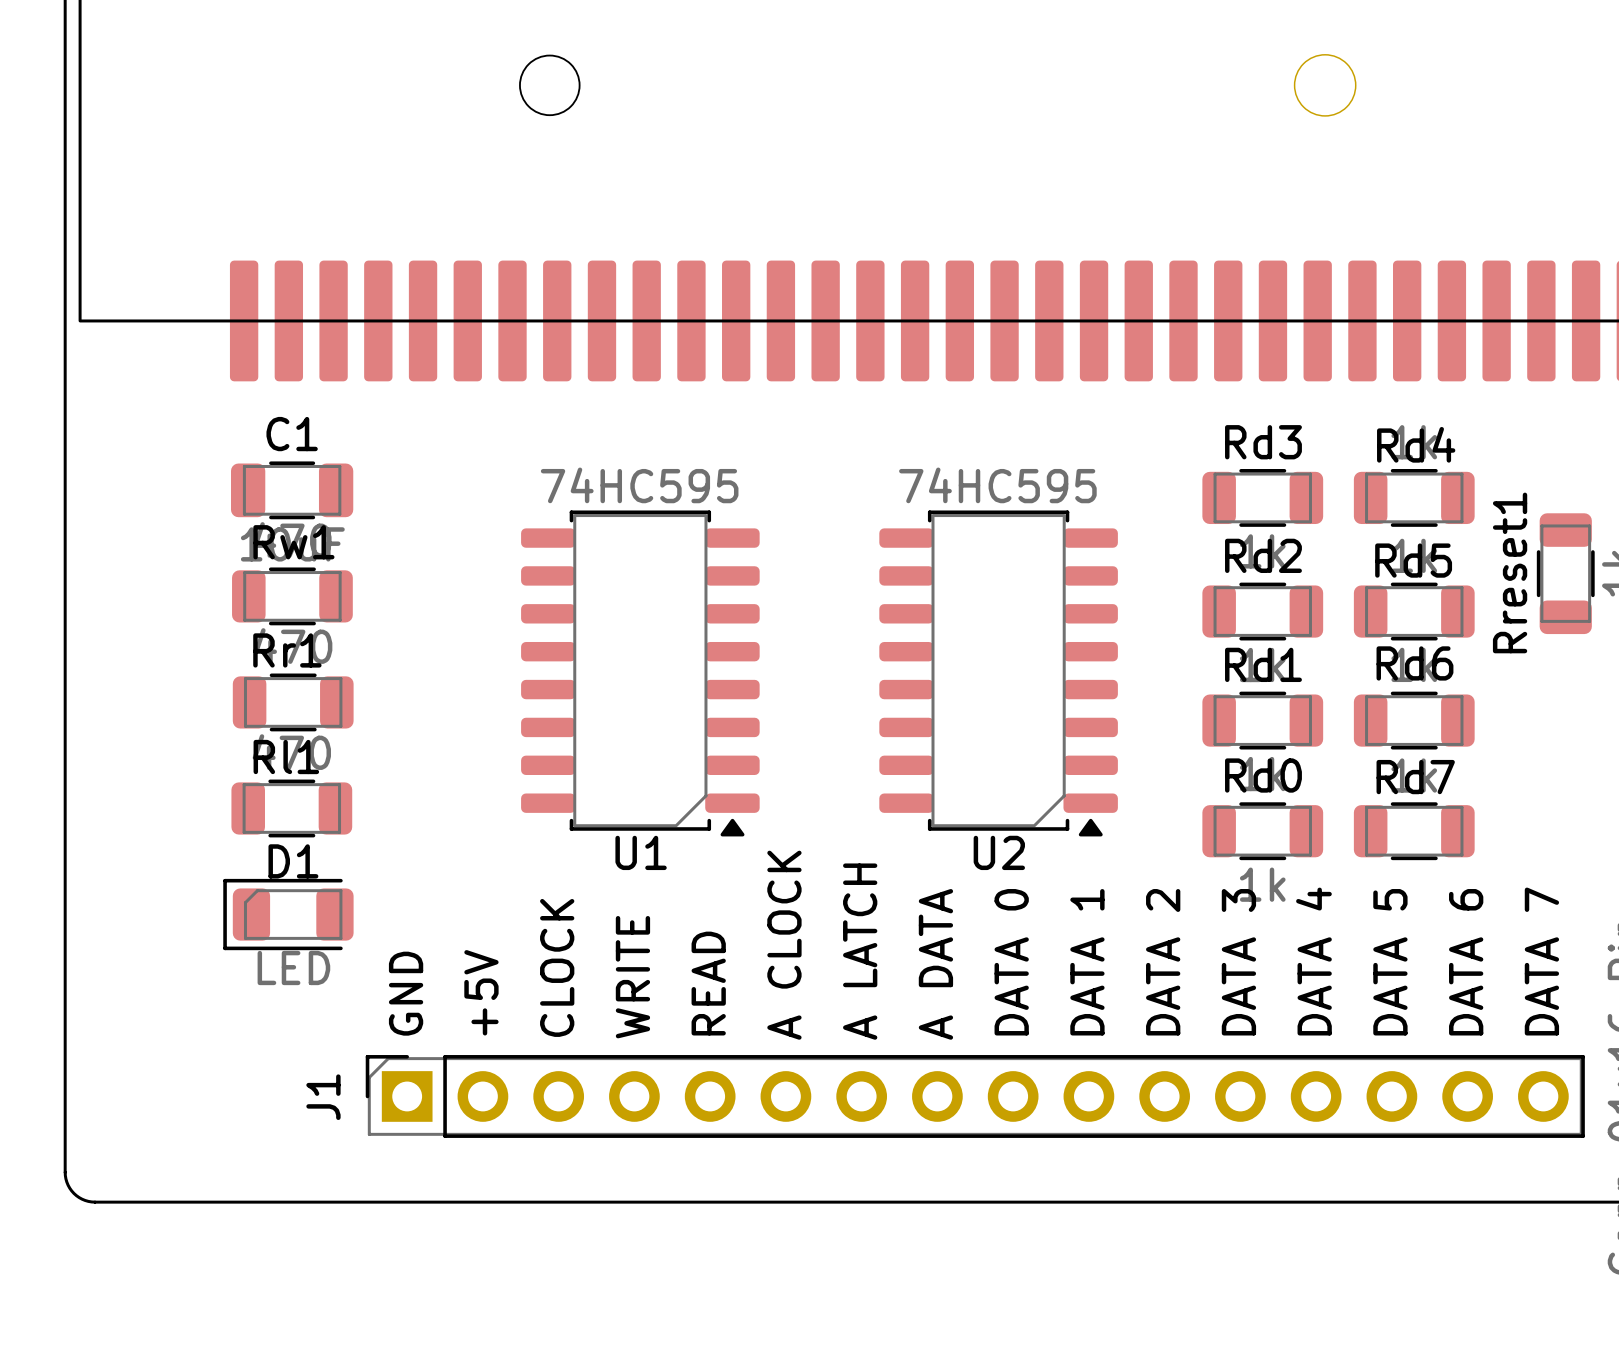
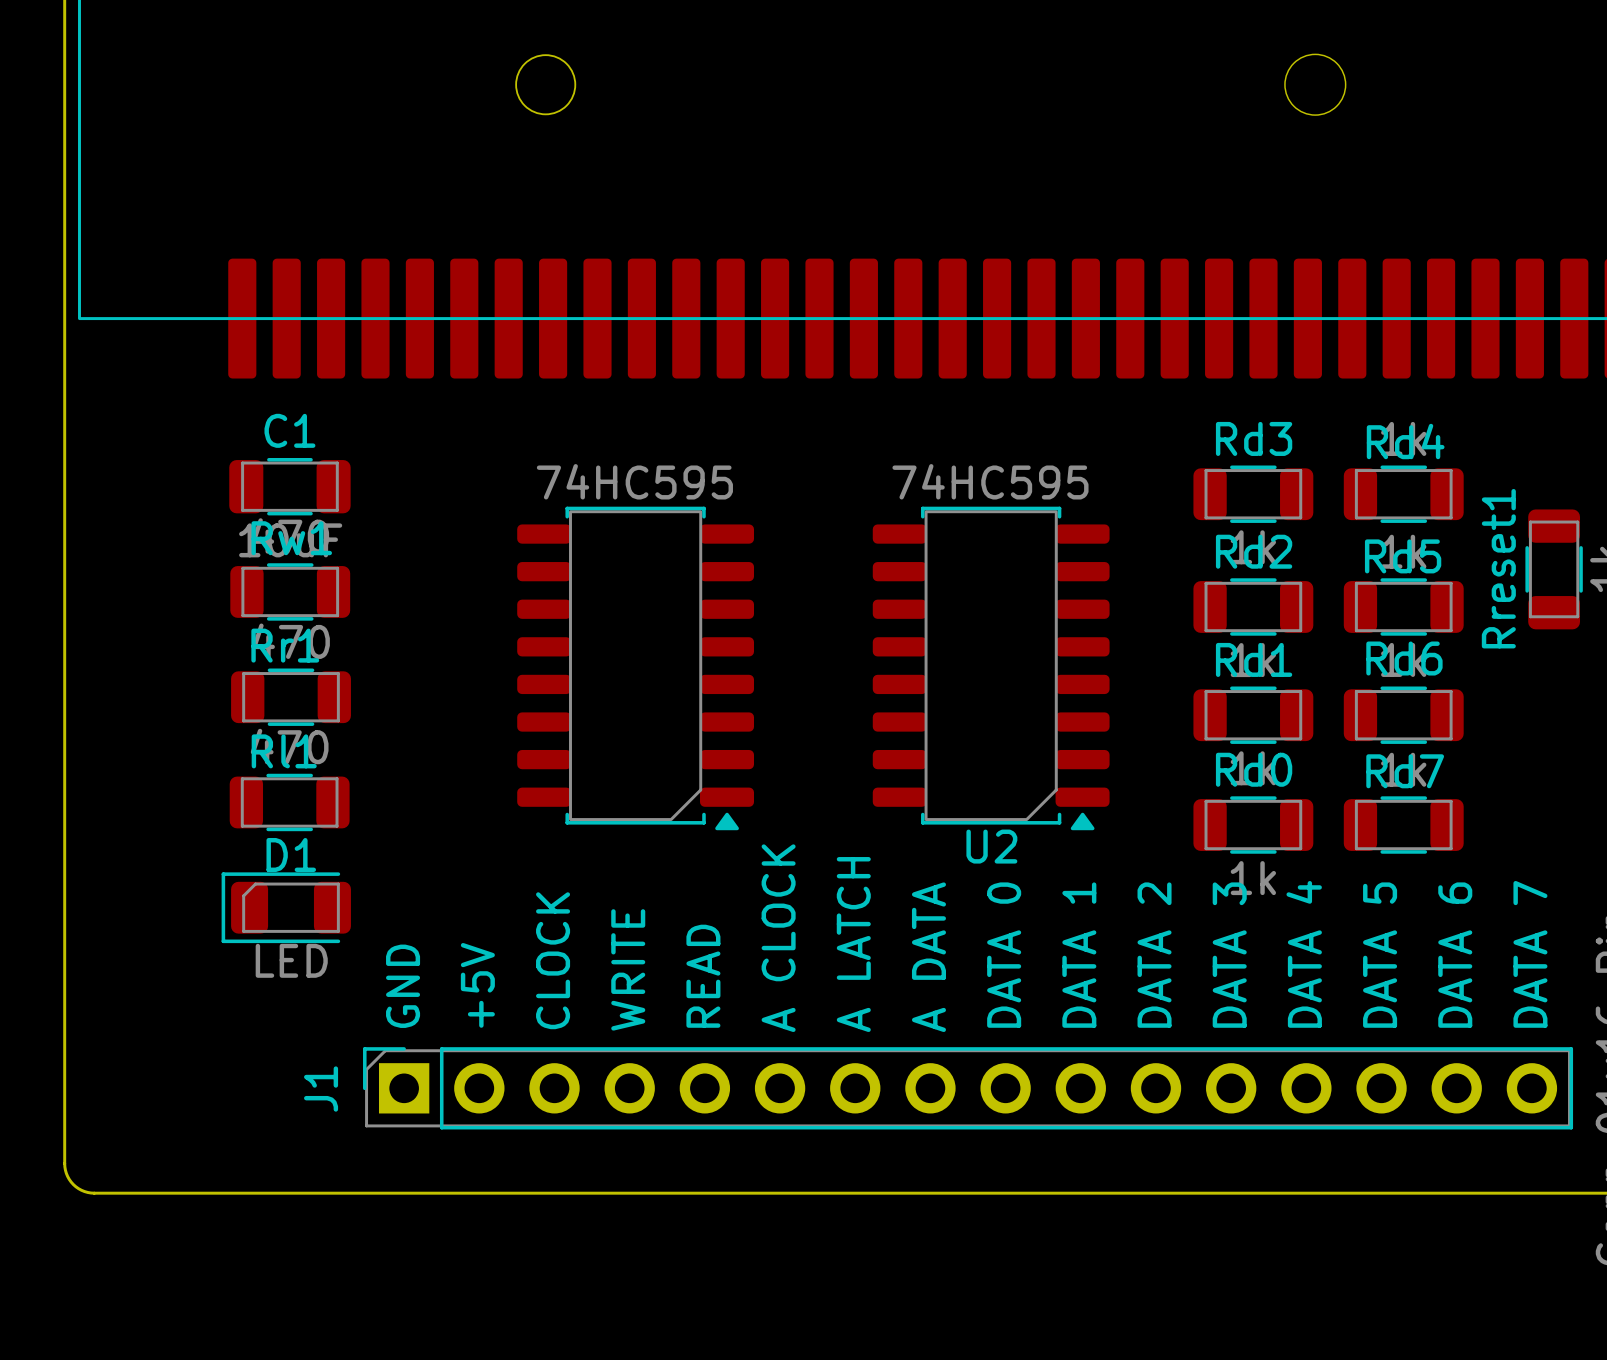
U1 name: U1 (641, 852) -> none

